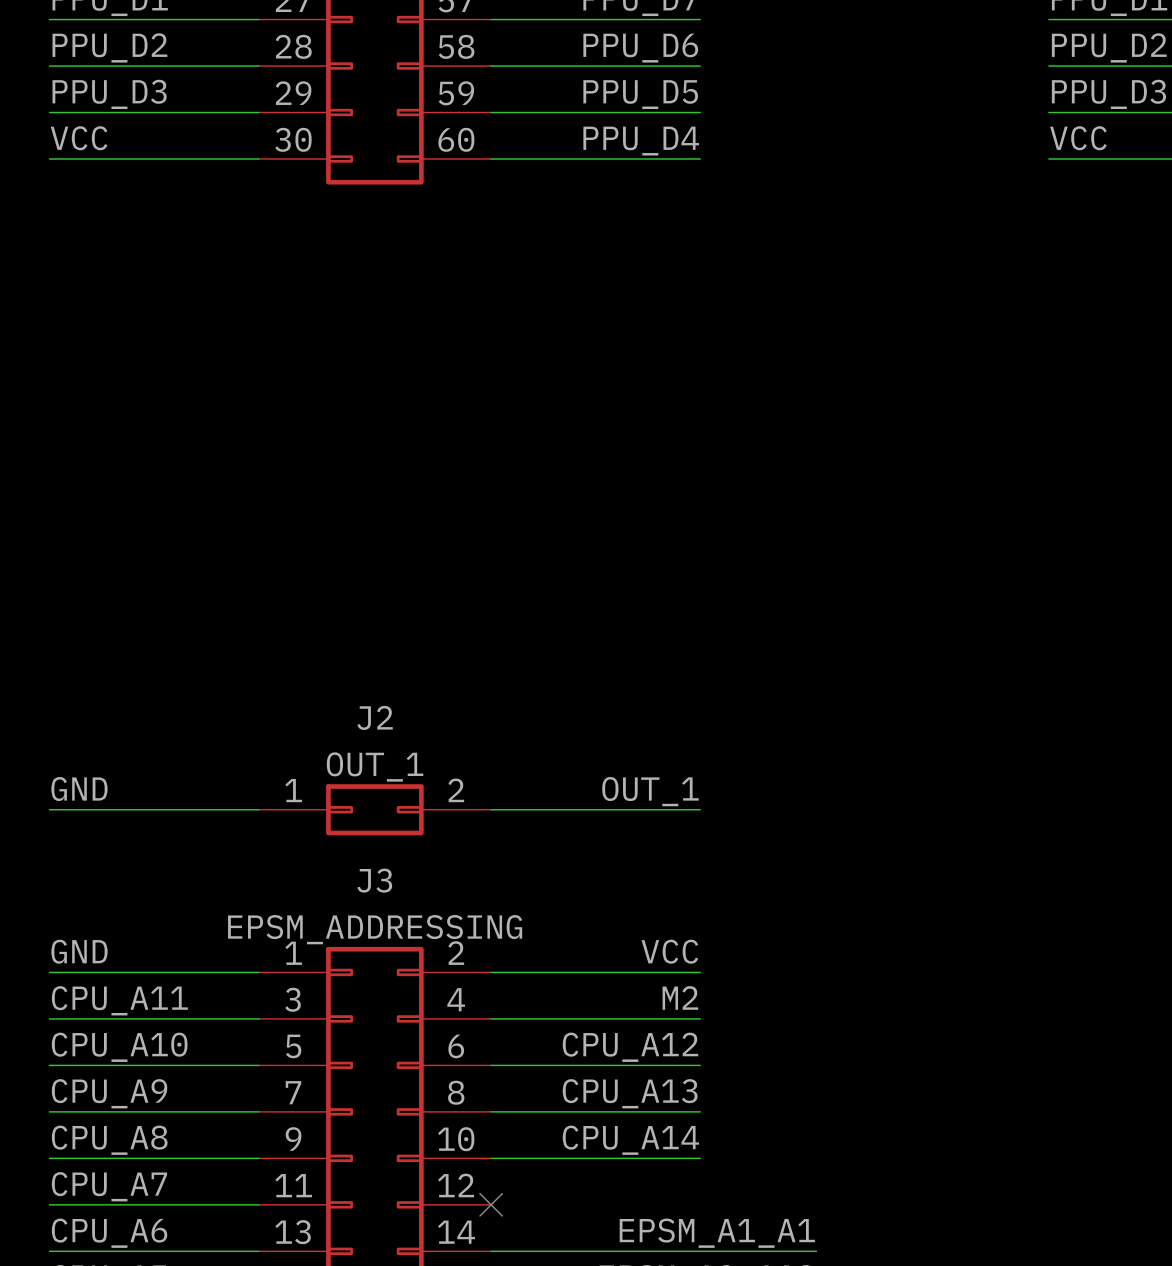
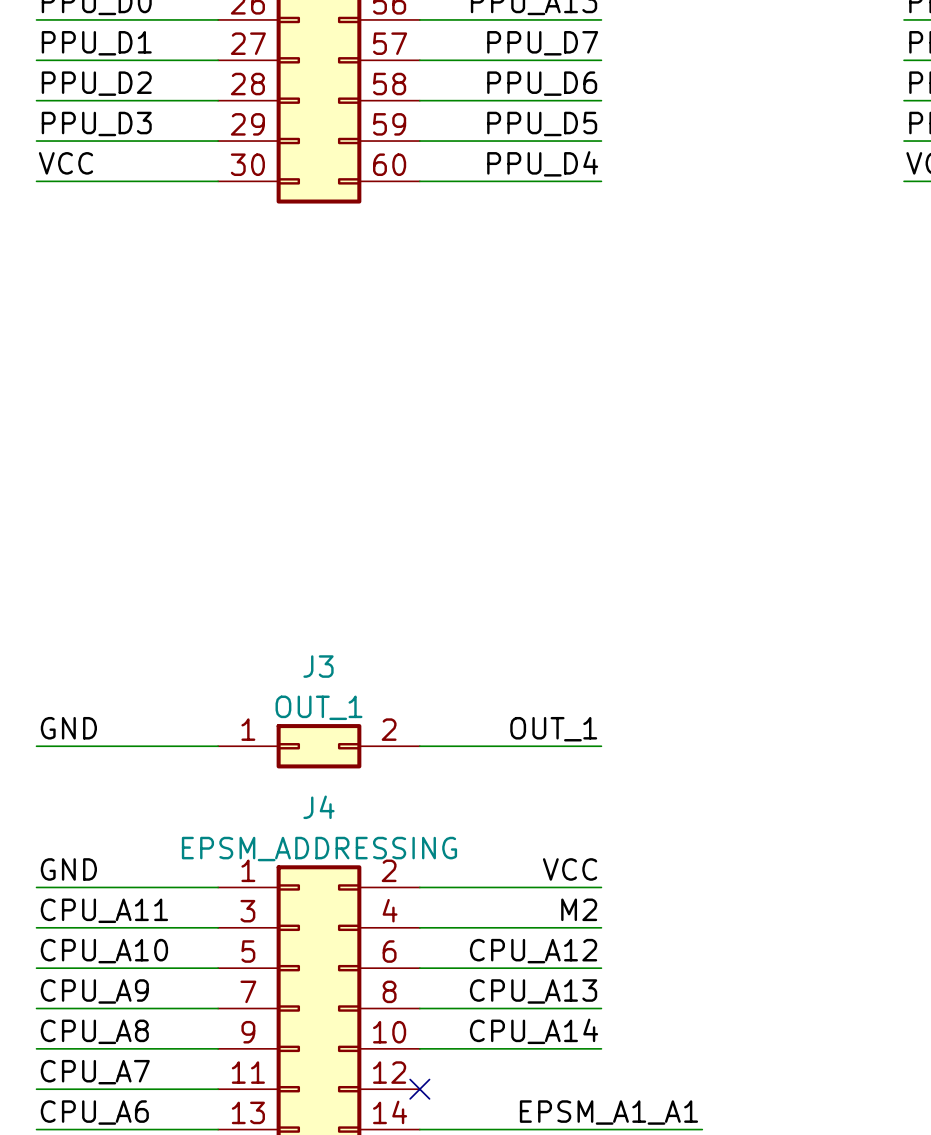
J2 name: J2 (375, 717) -> J3 (318, 666)
J3 name: J3 (374, 880) -> J4 (318, 807)

